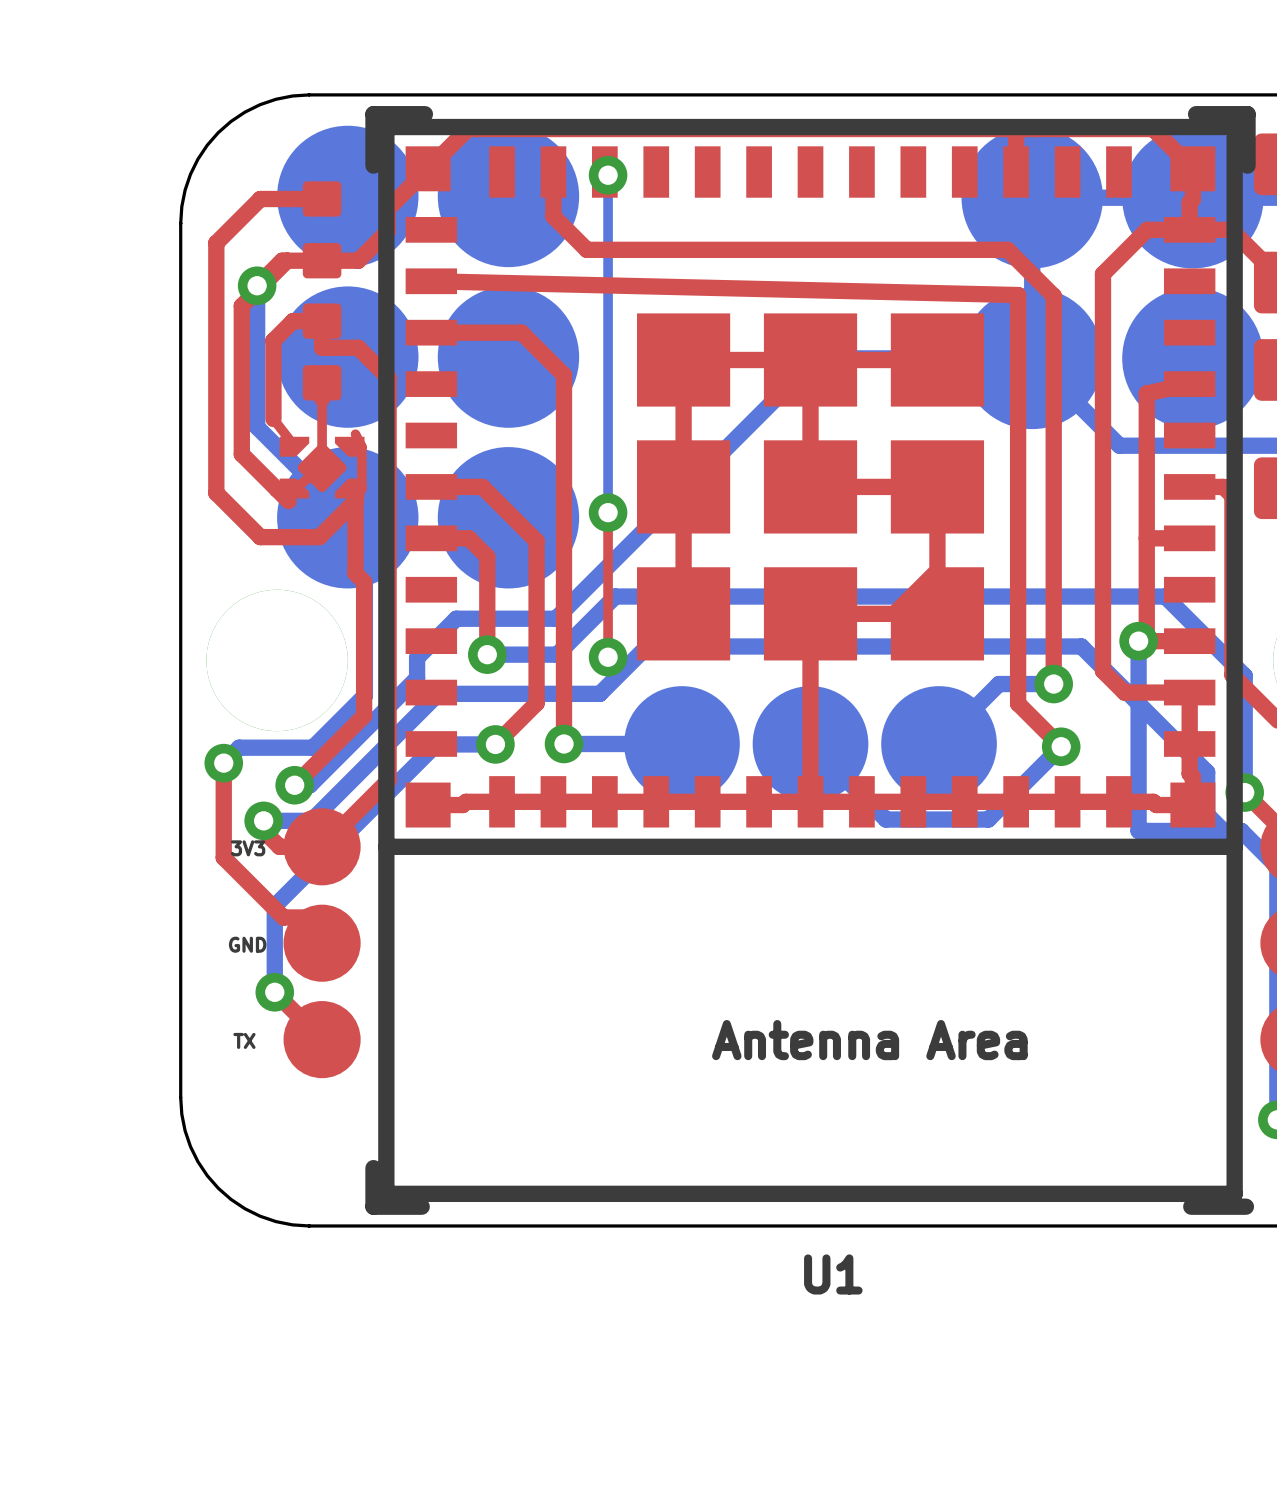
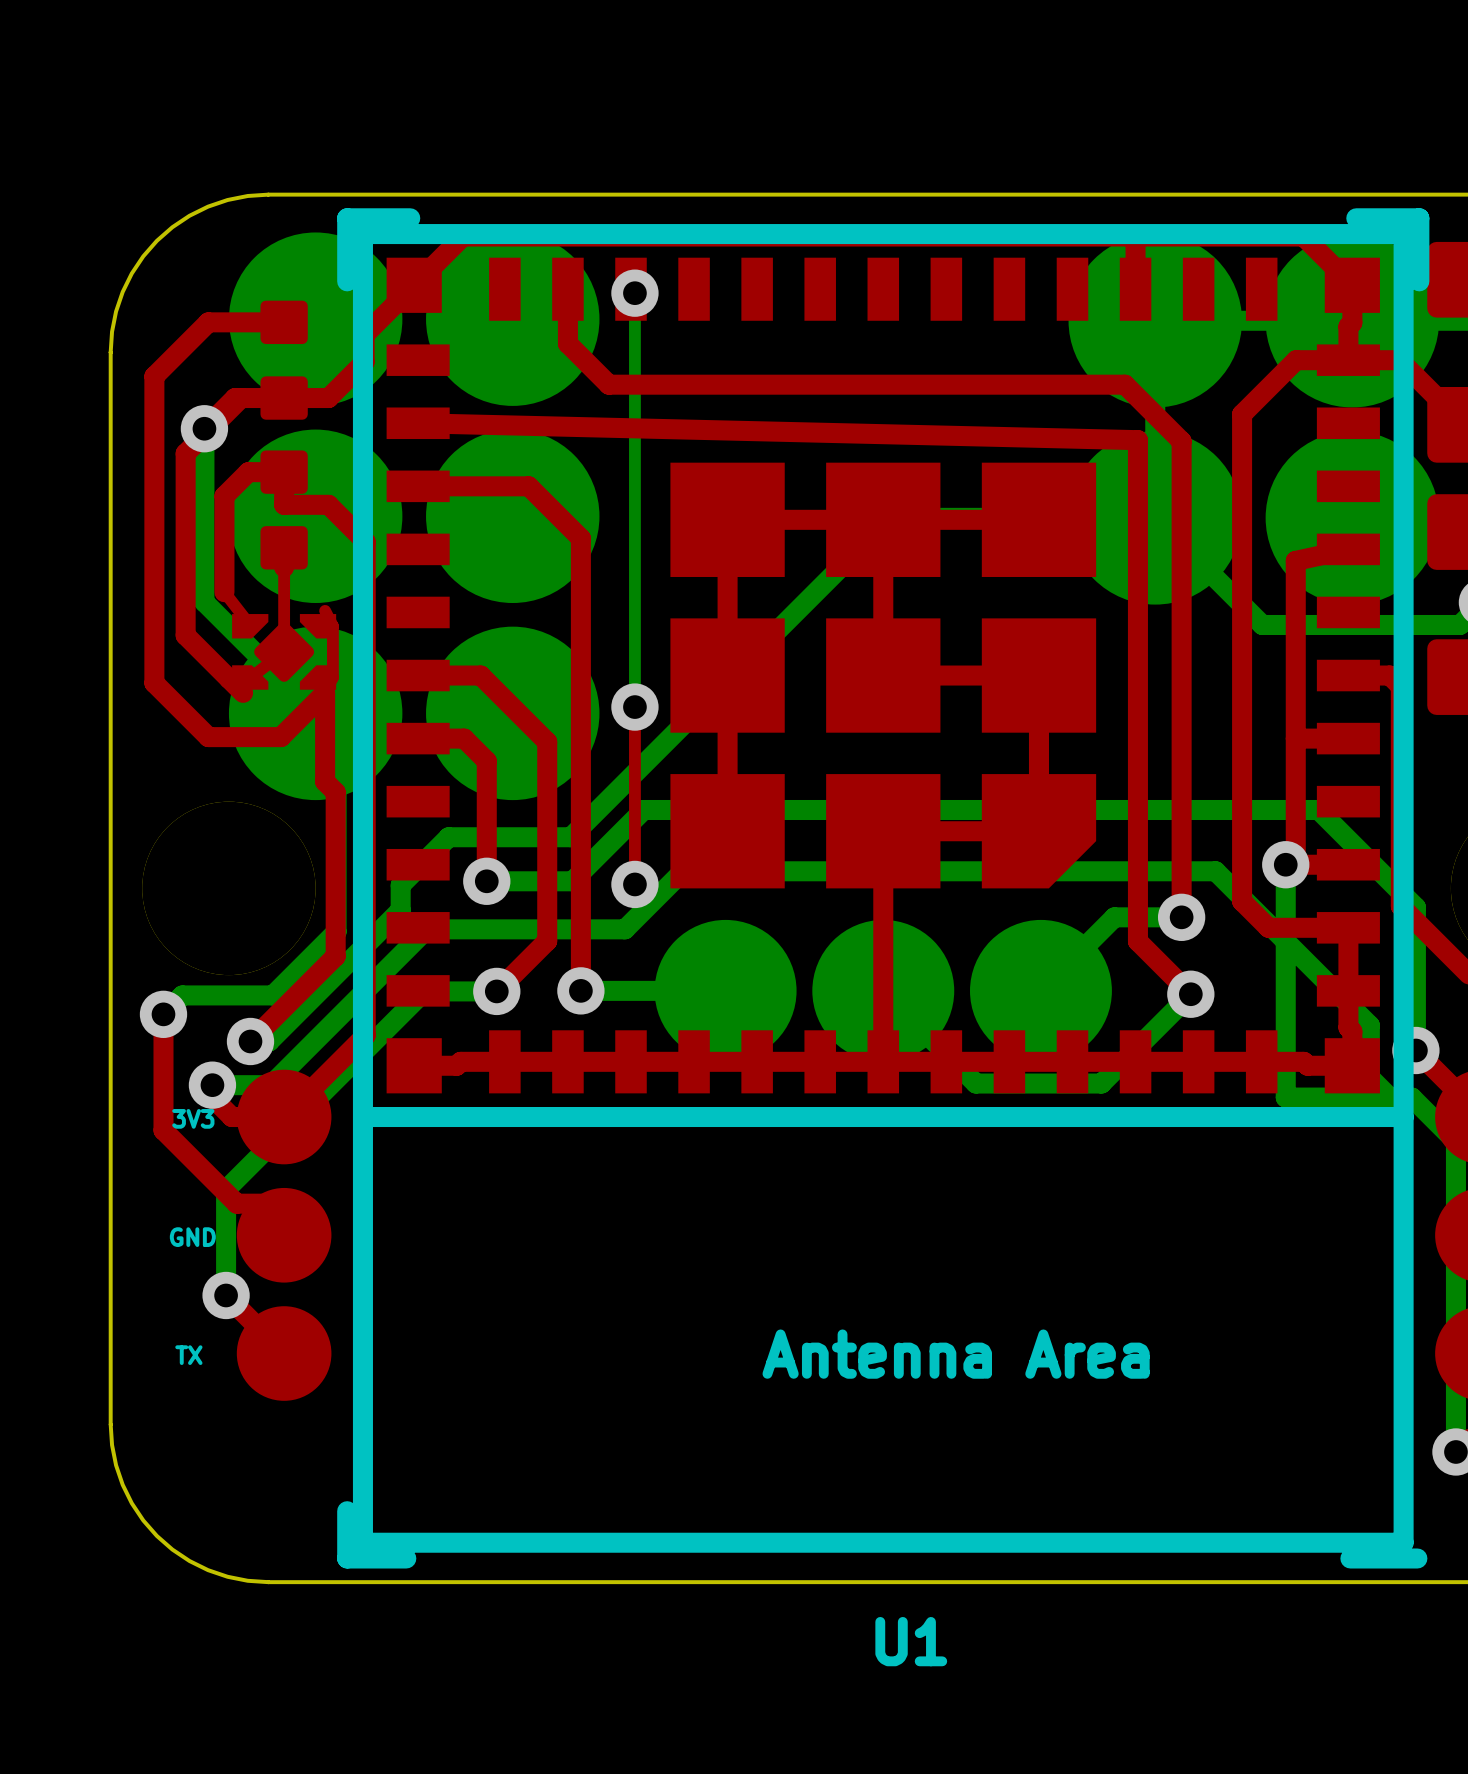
U1 footprint: [365, 106, 1256, 1215] -> [337, 208, 1430, 1569]

